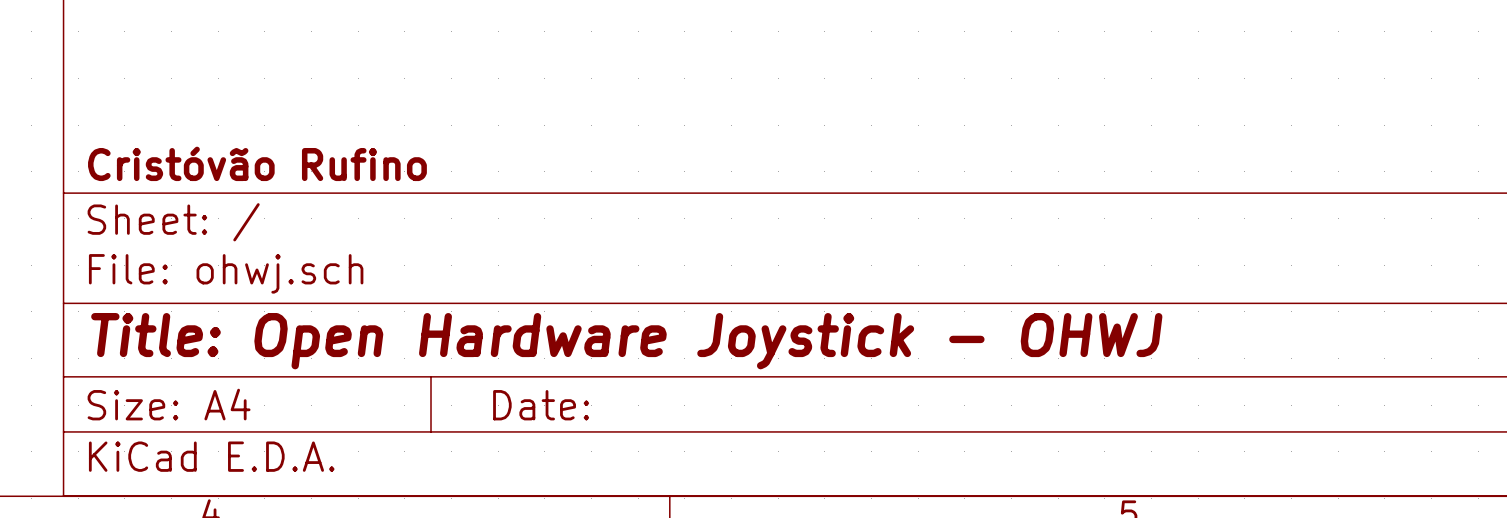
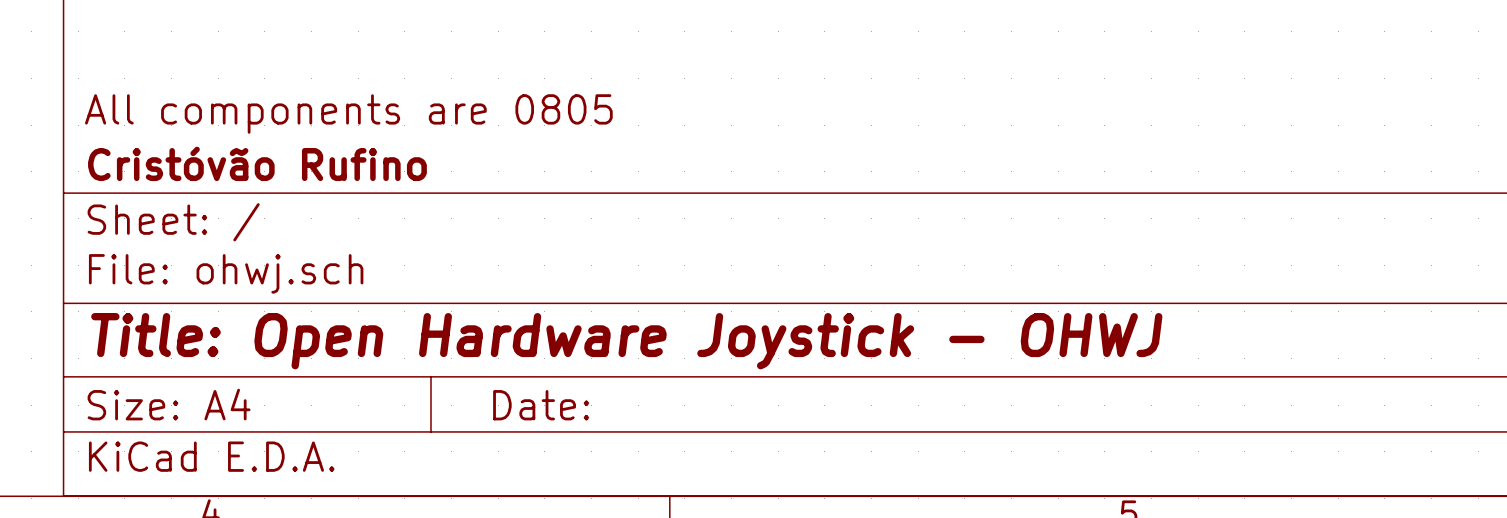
title block: none -> All components are 0805 (348, 114)

